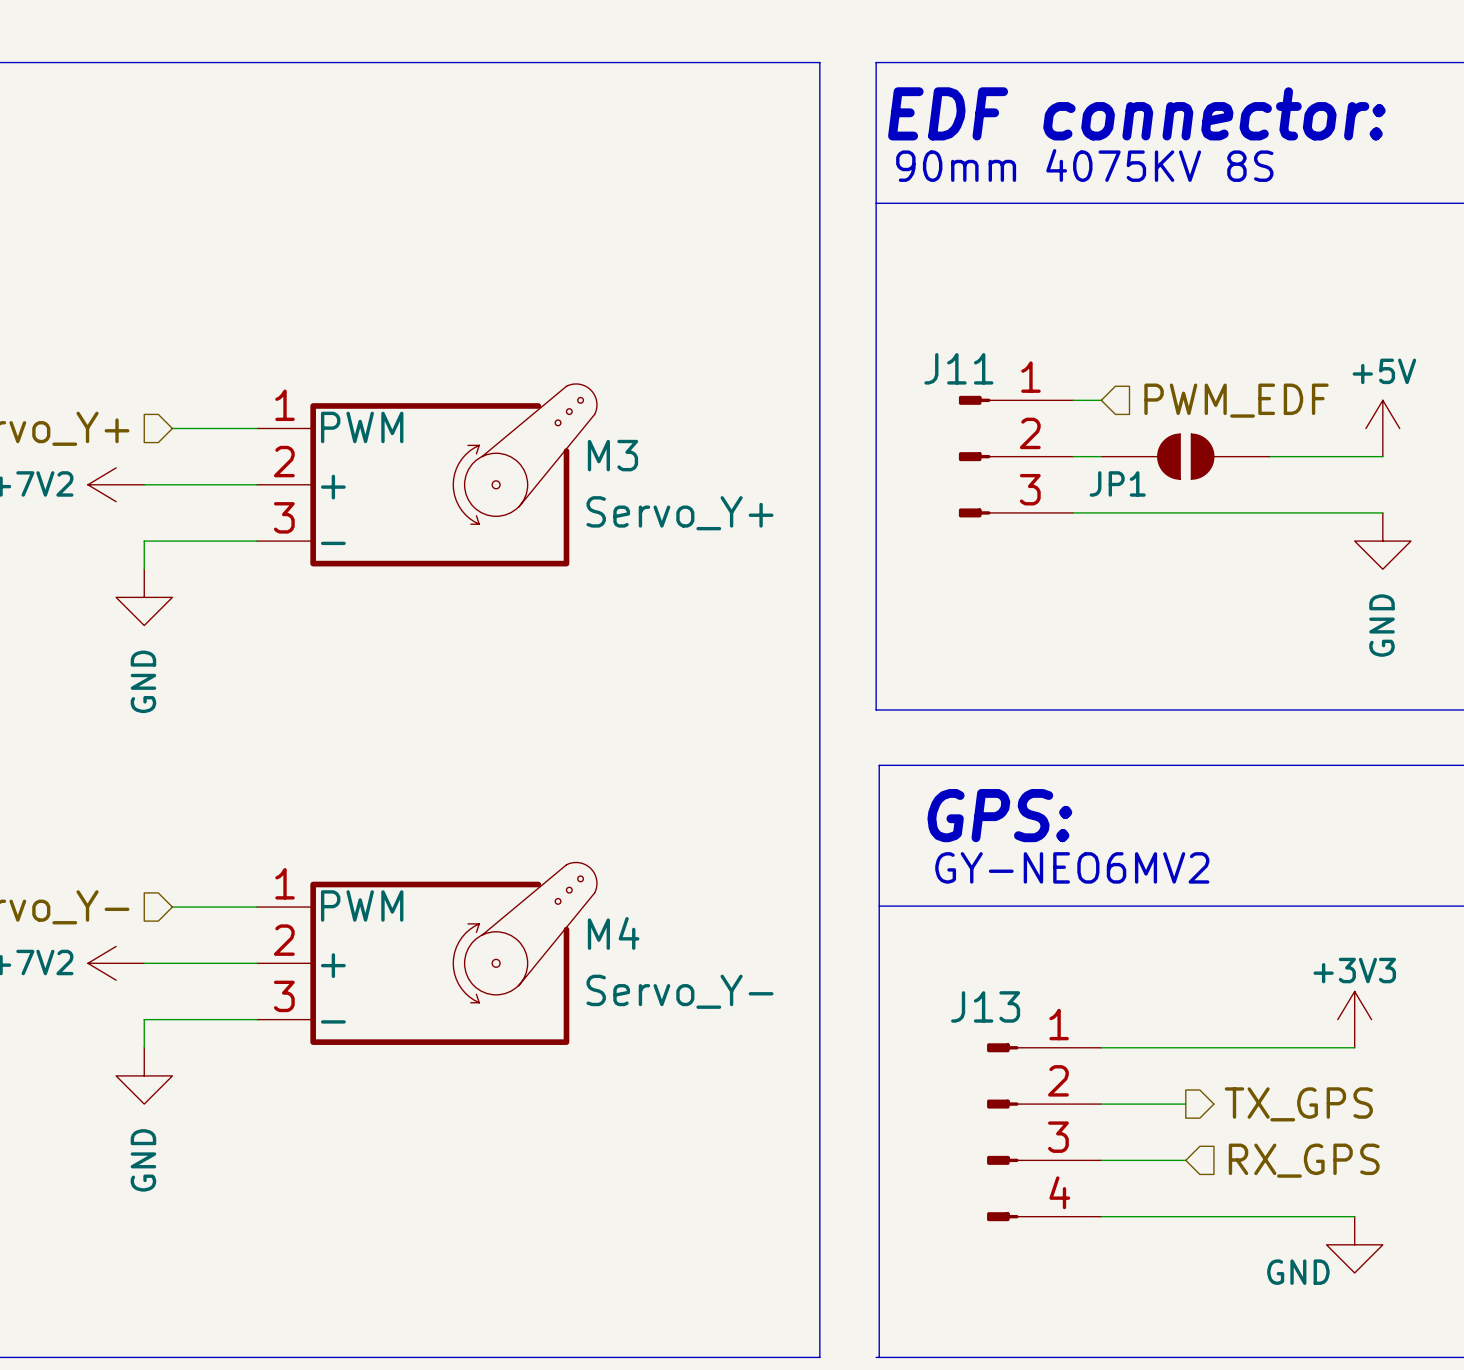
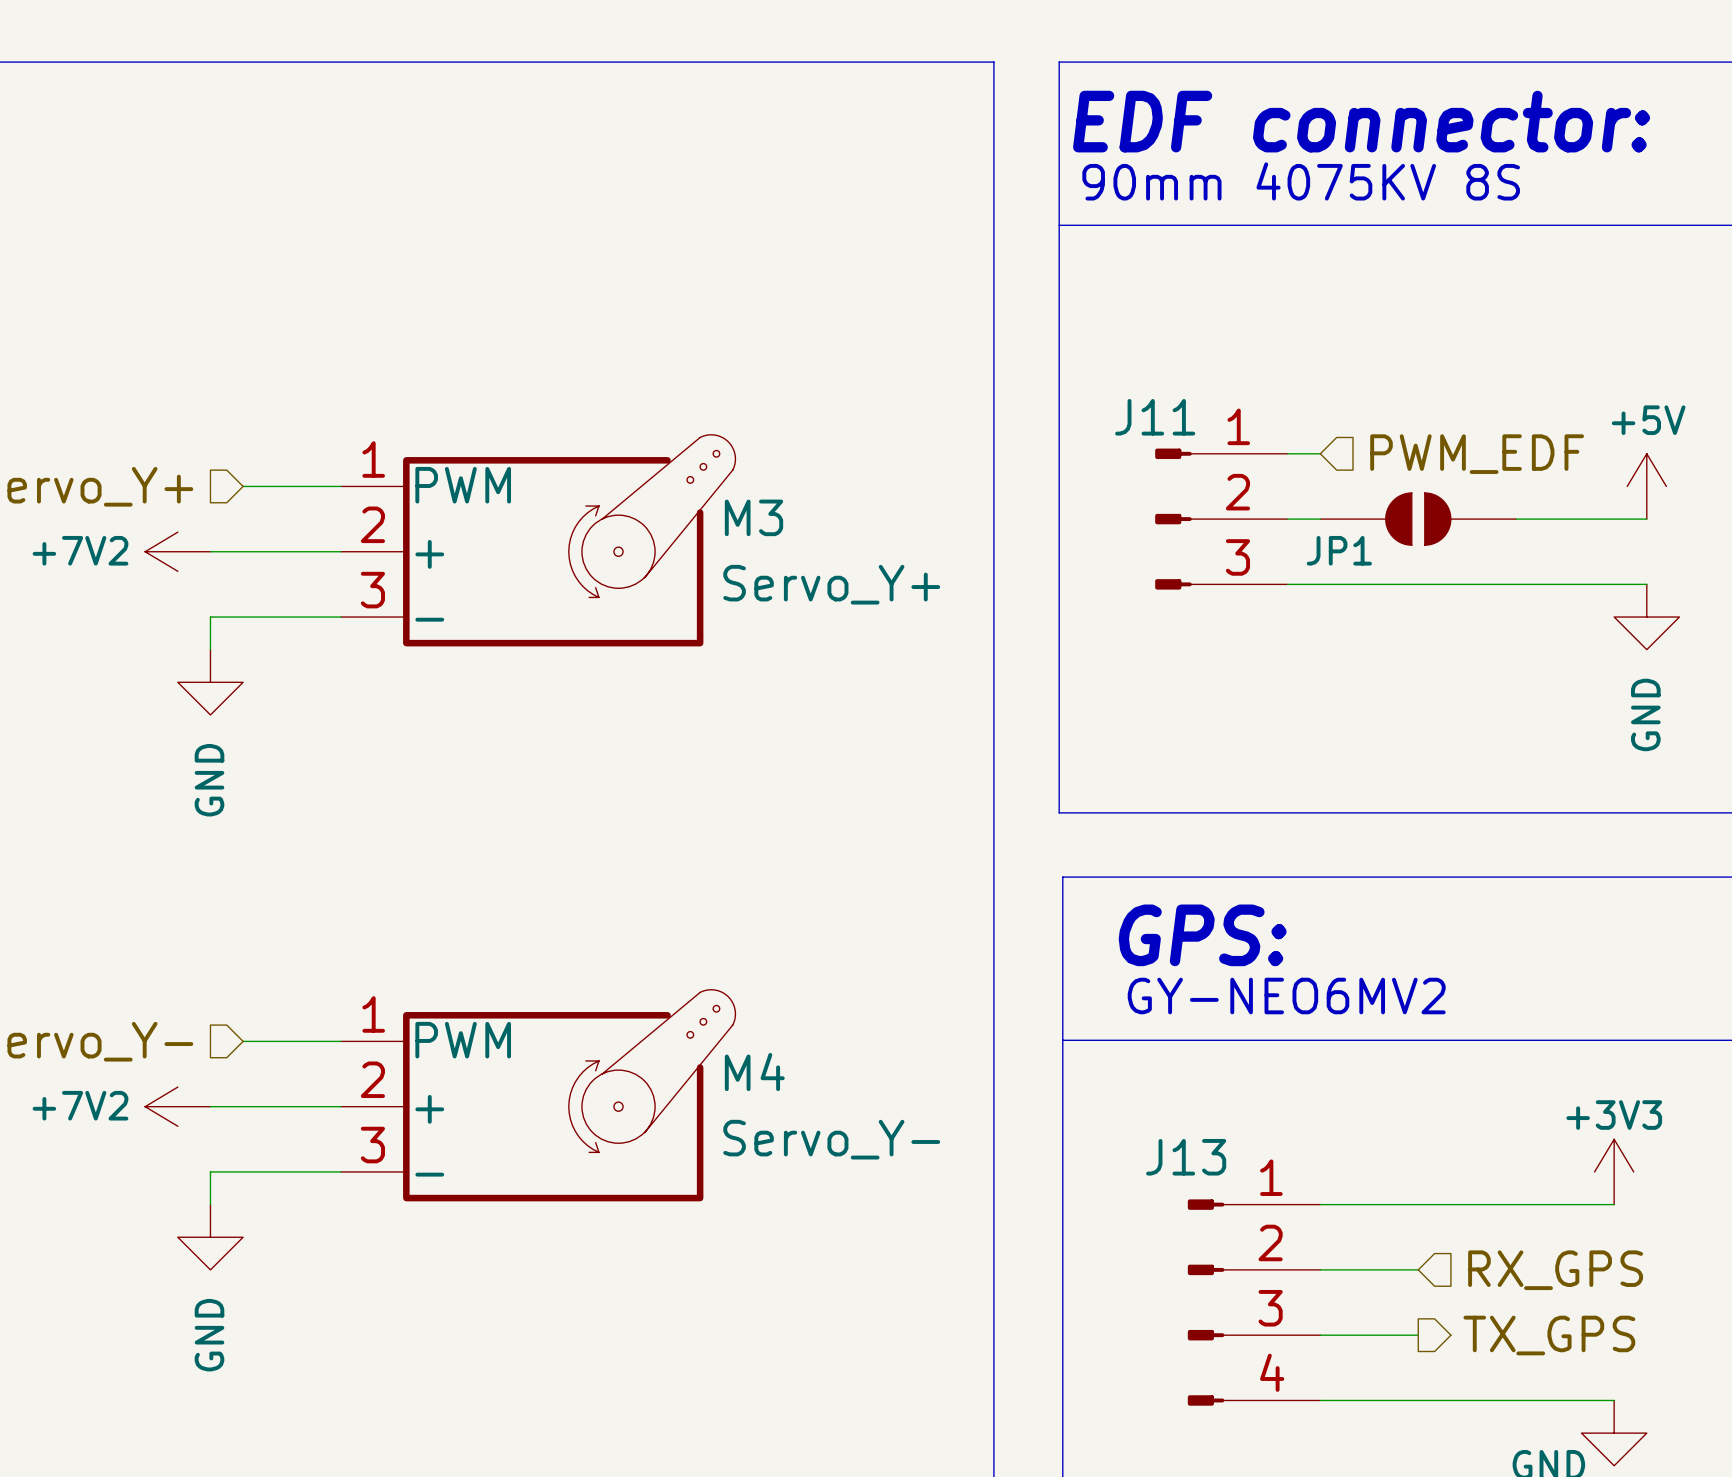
hierarchical label shape: output (1298, 1104) -> input (1555, 1270)
hierarchical label: TX_GPS (1298, 1104) -> RX_GPS (1555, 1270)
hierarchical label shape: input (1304, 1160) -> output (1549, 1335)
hierarchical label: RX_GPS (1304, 1160) -> TX_GPS (1549, 1335)

